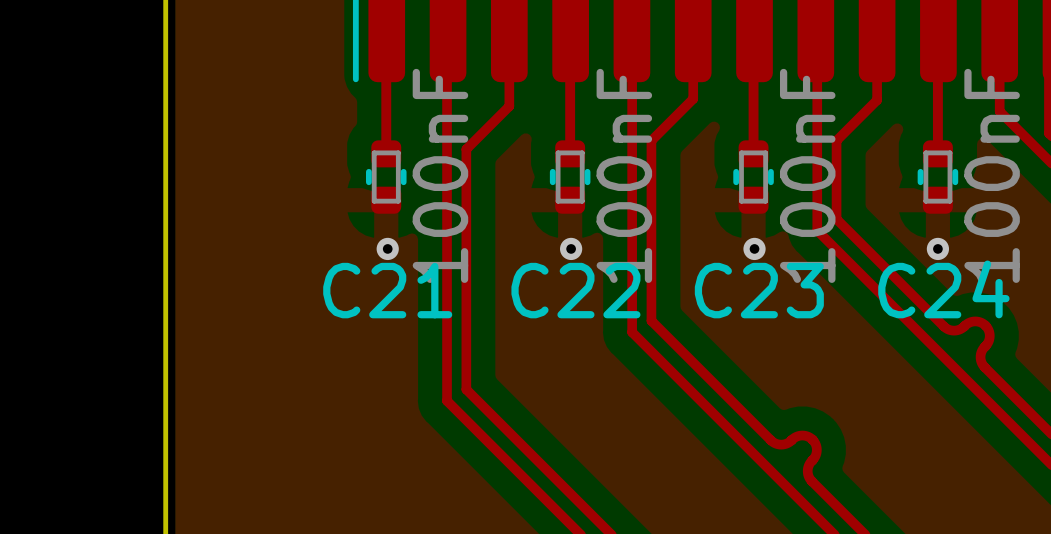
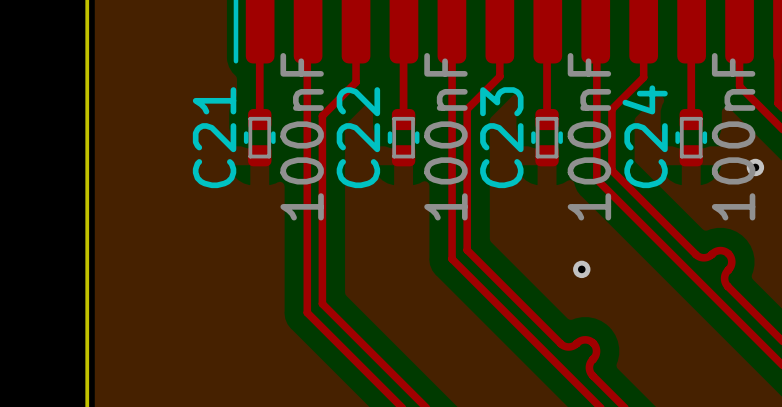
via: none -> (755, 167)
via: (387, 248) -> none
via: (571, 248) -> none
via: (754, 248) -> none
via: (937, 248) -> none
C24 name rotation: 0° (943, 289) -> 90° counterclockwise (645, 136)
C21 name rotation: 0° (387, 290) -> 90° counterclockwise (214, 137)
C22 name rotation: 0° (575, 290) -> 90° counterclockwise (358, 137)
C23 name rotation: 0° (759, 290) -> 90° counterclockwise (501, 137)
via: none -> (581, 269)

